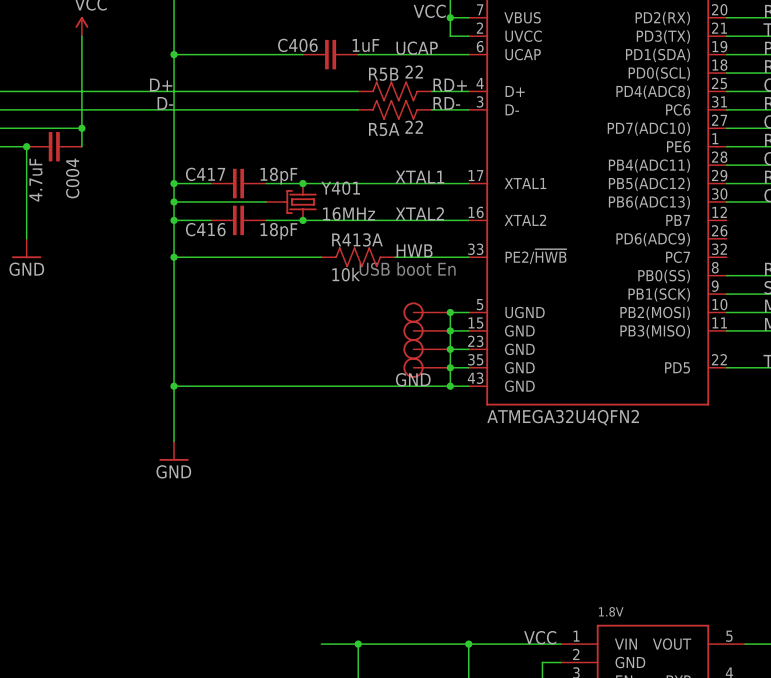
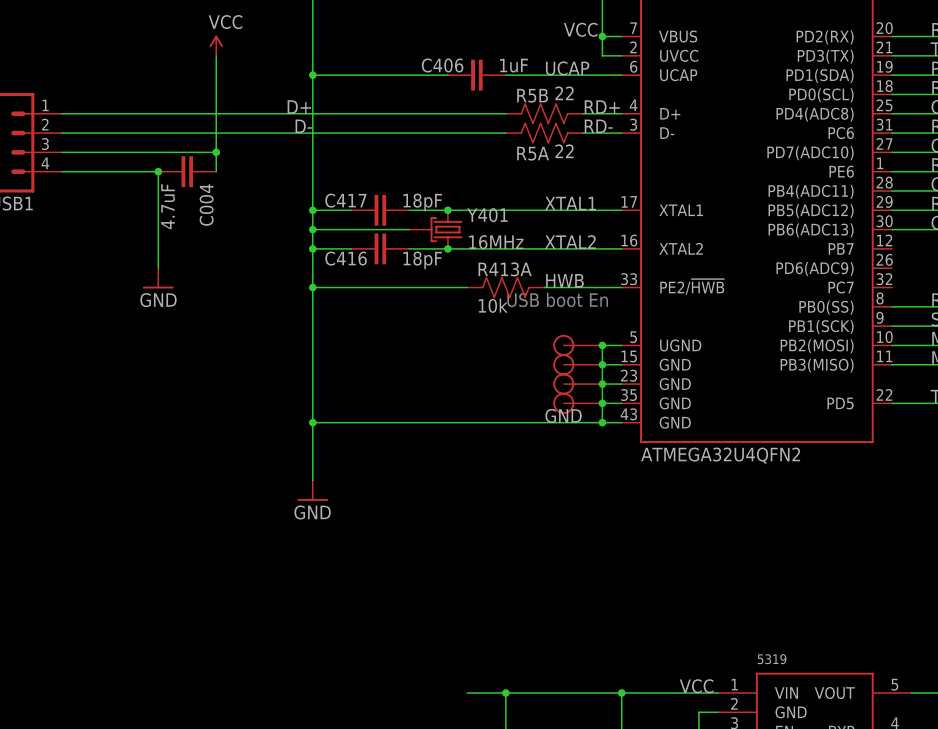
part value: 1.8V (611, 611) -> 5319 (772, 659)

